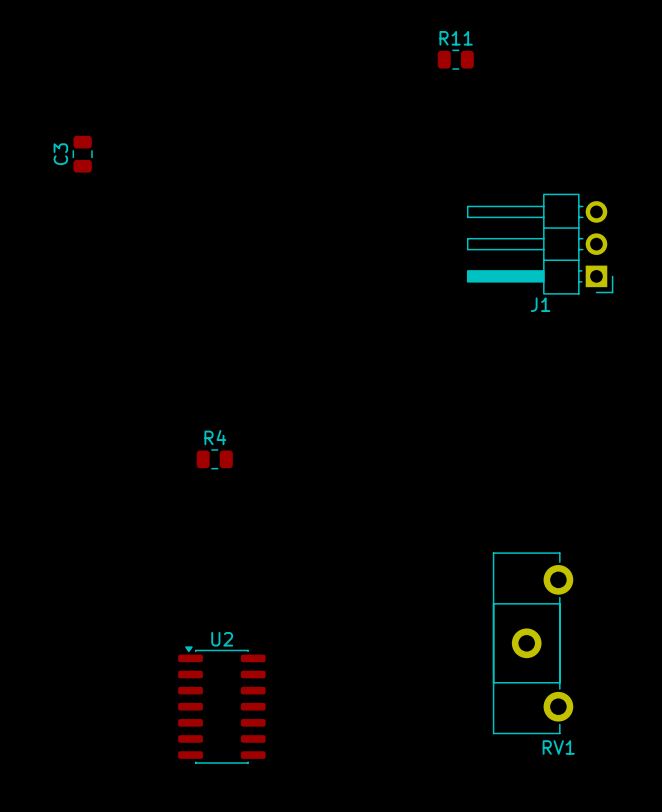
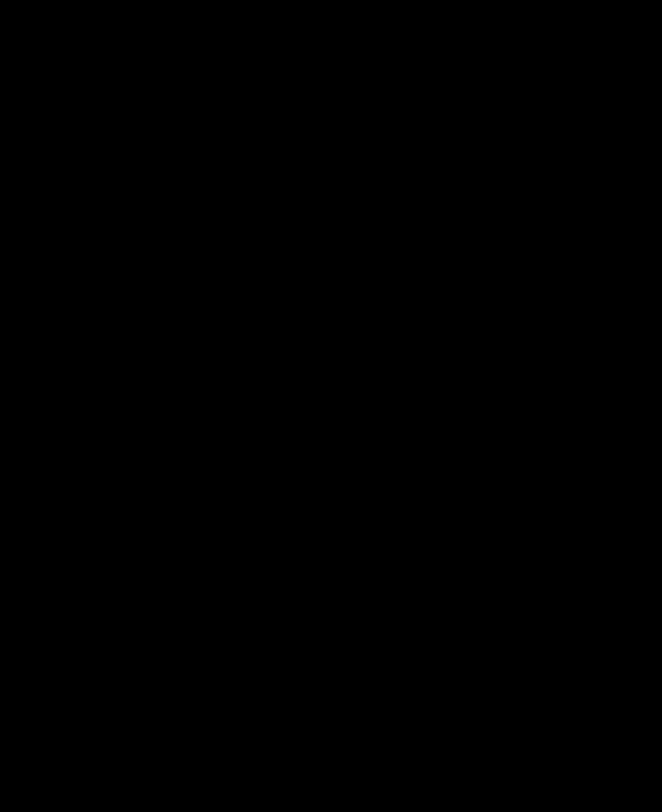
R11: (455, 59) -> none
C3: (82, 154) -> none
J1: (540, 244) -> none
R4: (214, 459) -> none
RV1: (533, 643) -> none
U2: (221, 705) -> none

